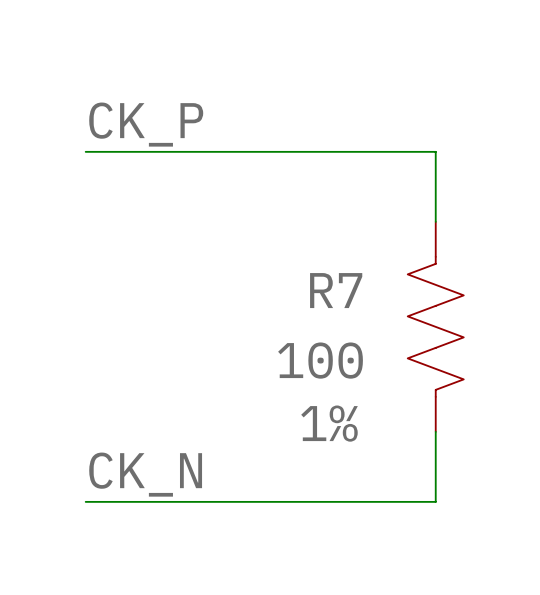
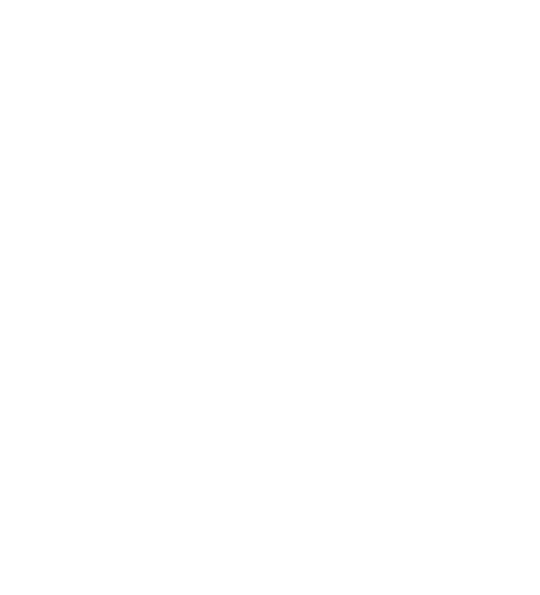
label: CK_P (146, 124) -> none
wire: (85, 151) (435, 151) (435, 221) -> none
R7: 100 (435, 326) -> none
wire: (435, 431) (435, 501) (85, 501) -> none
label: CK_N (145, 474) -> none

